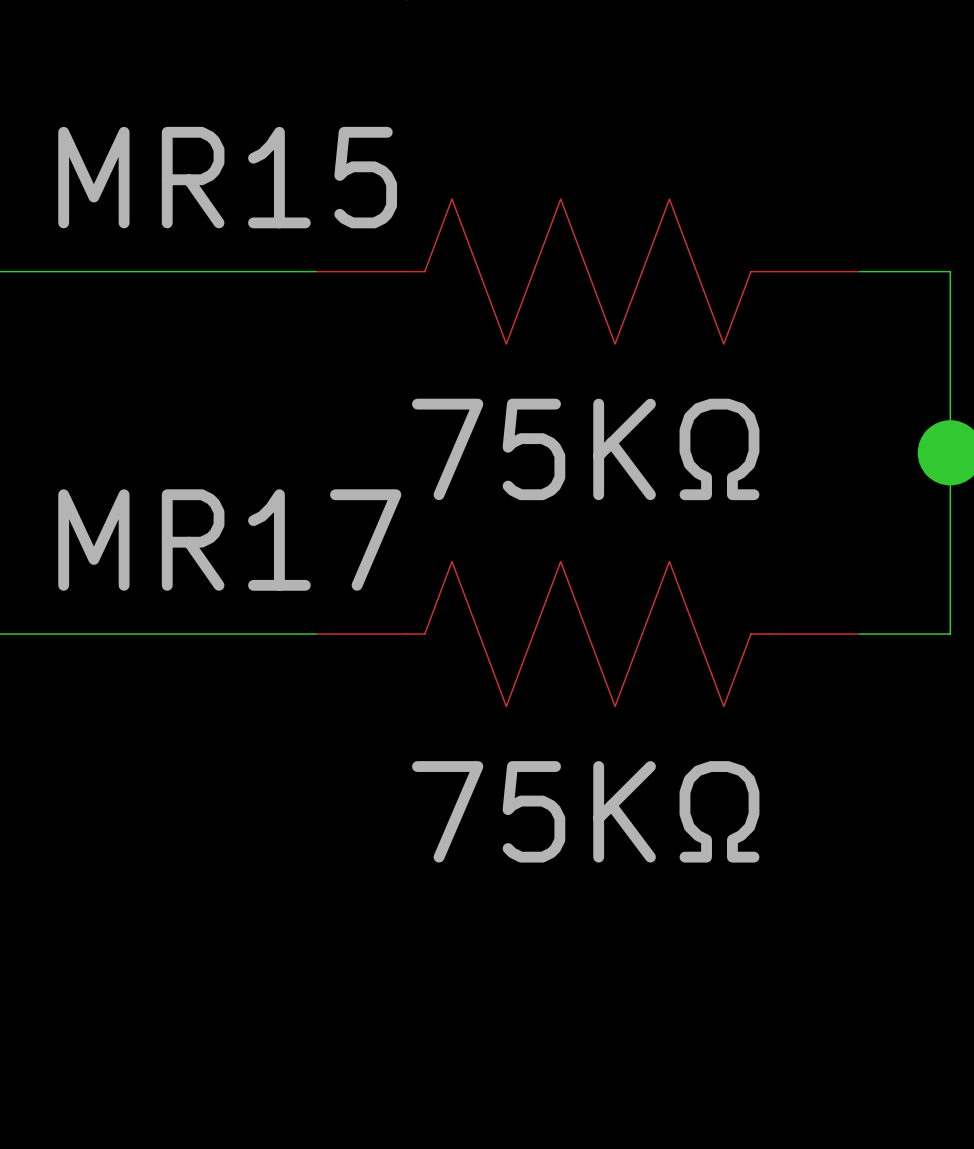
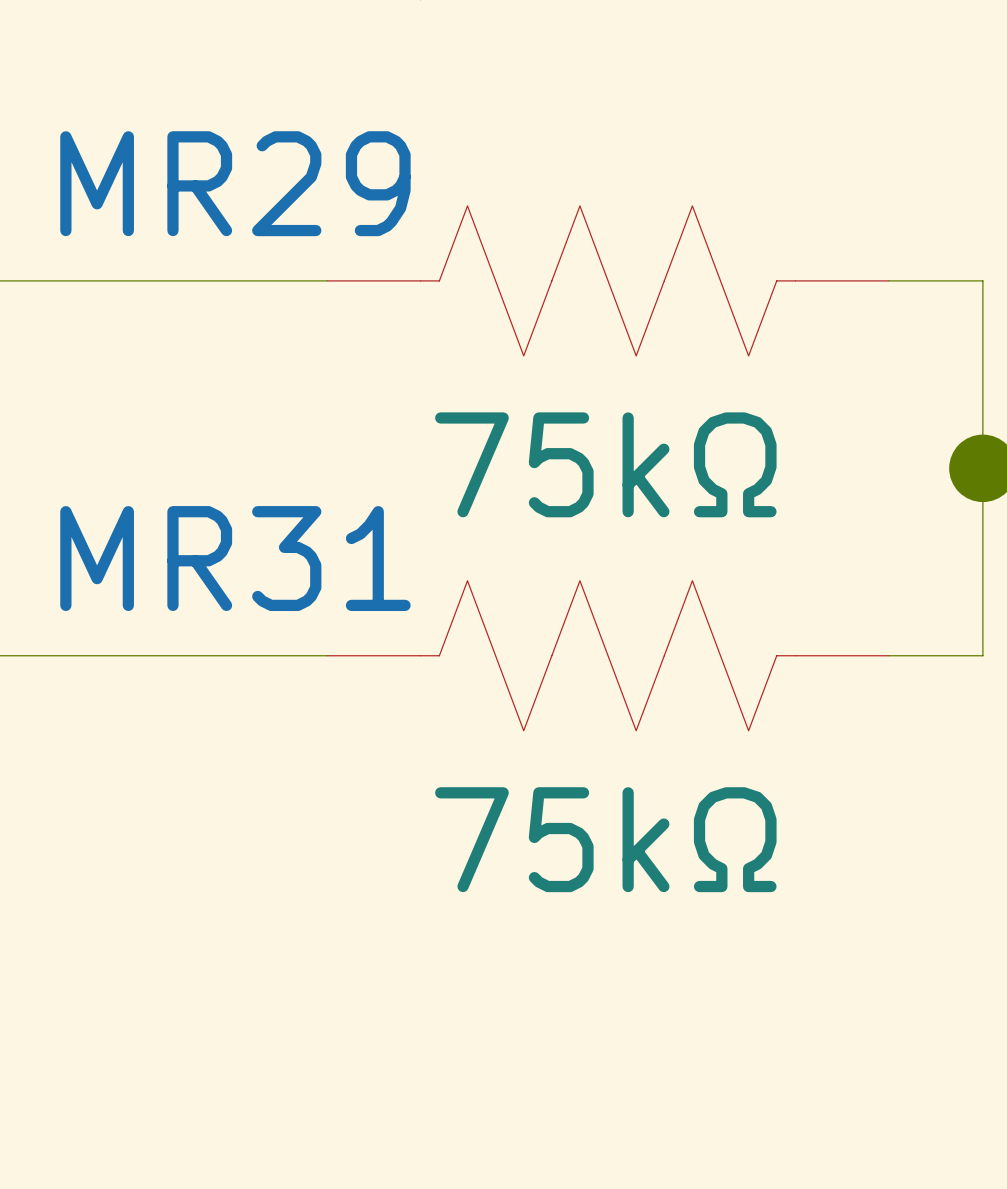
MR15 name: MR15 (227, 177) -> MR29 (235, 183)
MR15 value: 75KΩ (585, 449) -> 75kΩ (605, 464)
MR17 name: MR17 (229, 540) -> MR31 (235, 558)
MR17 value: 75KΩ (585, 811) -> 75kΩ (605, 839)

